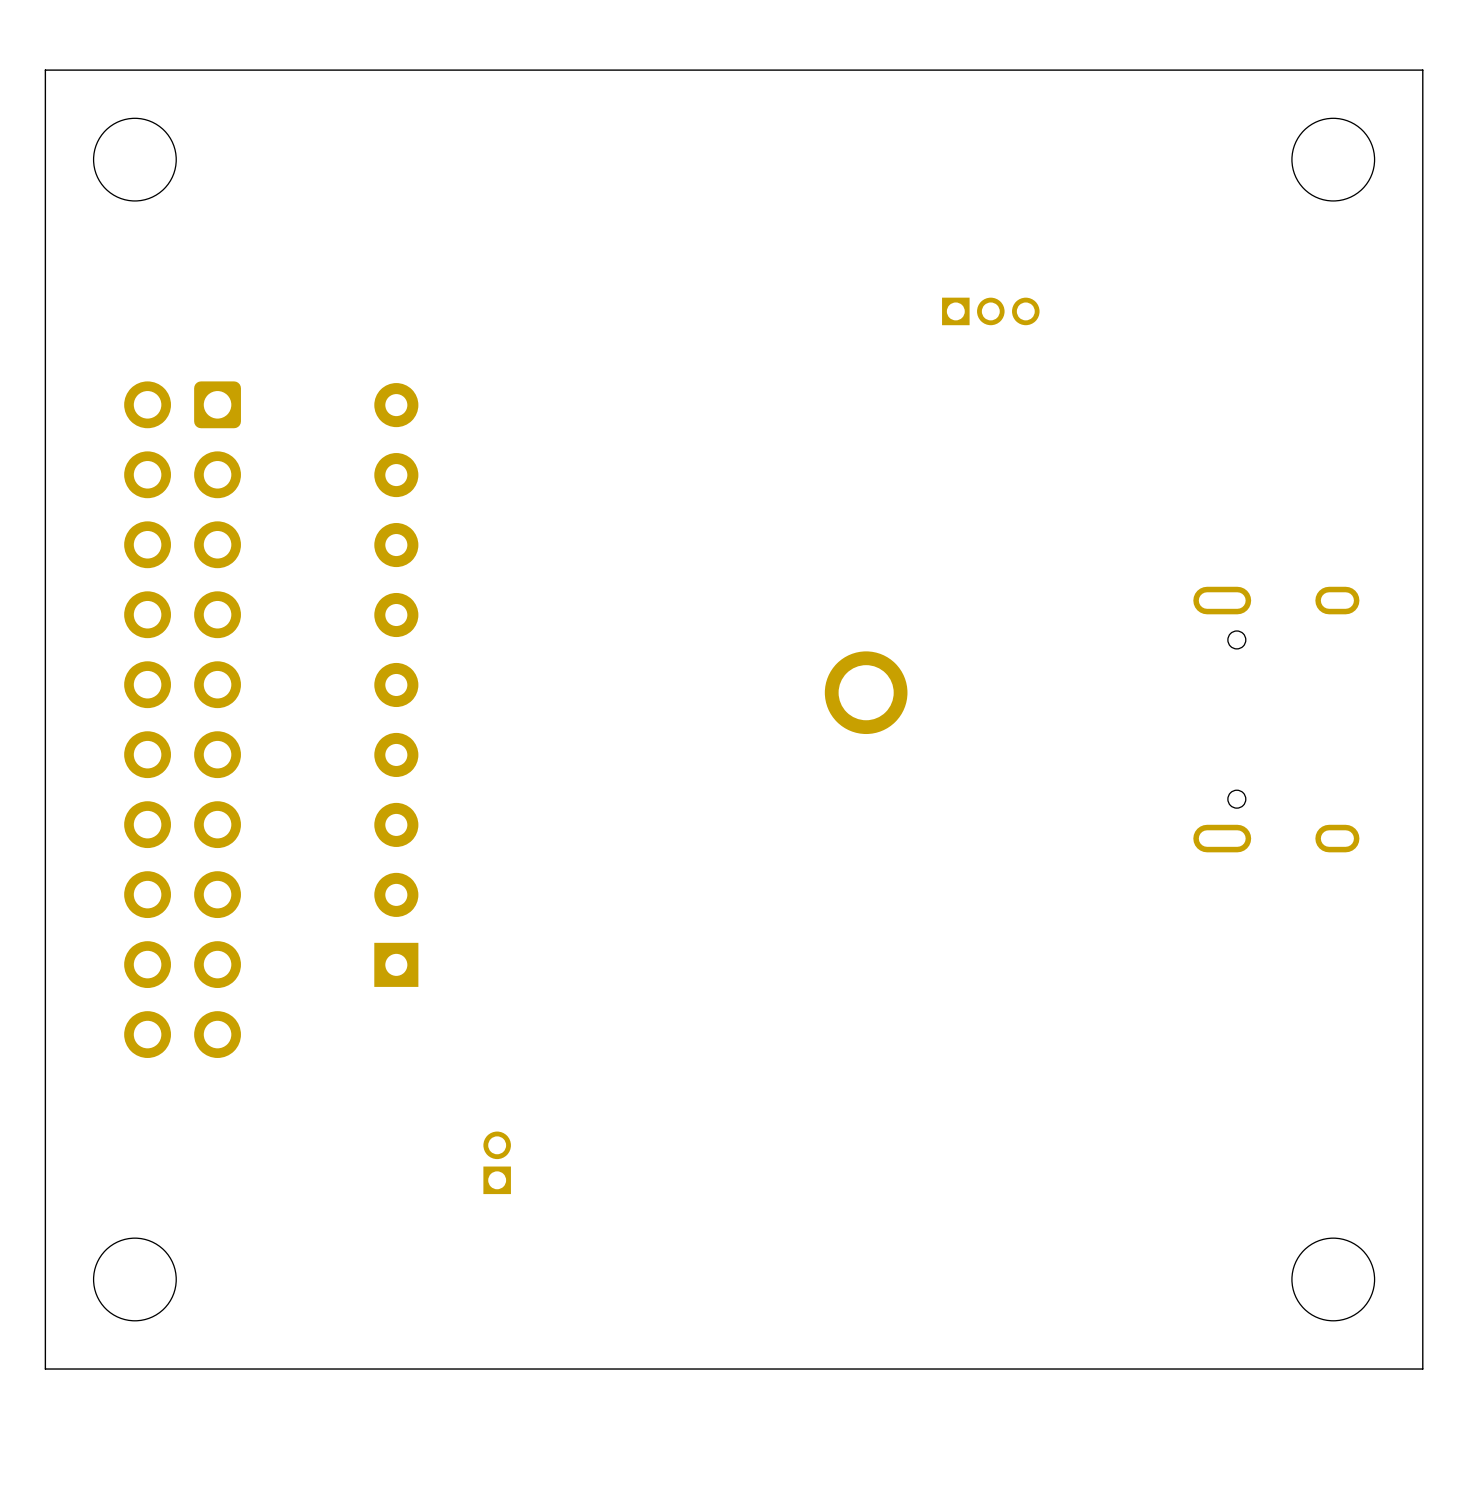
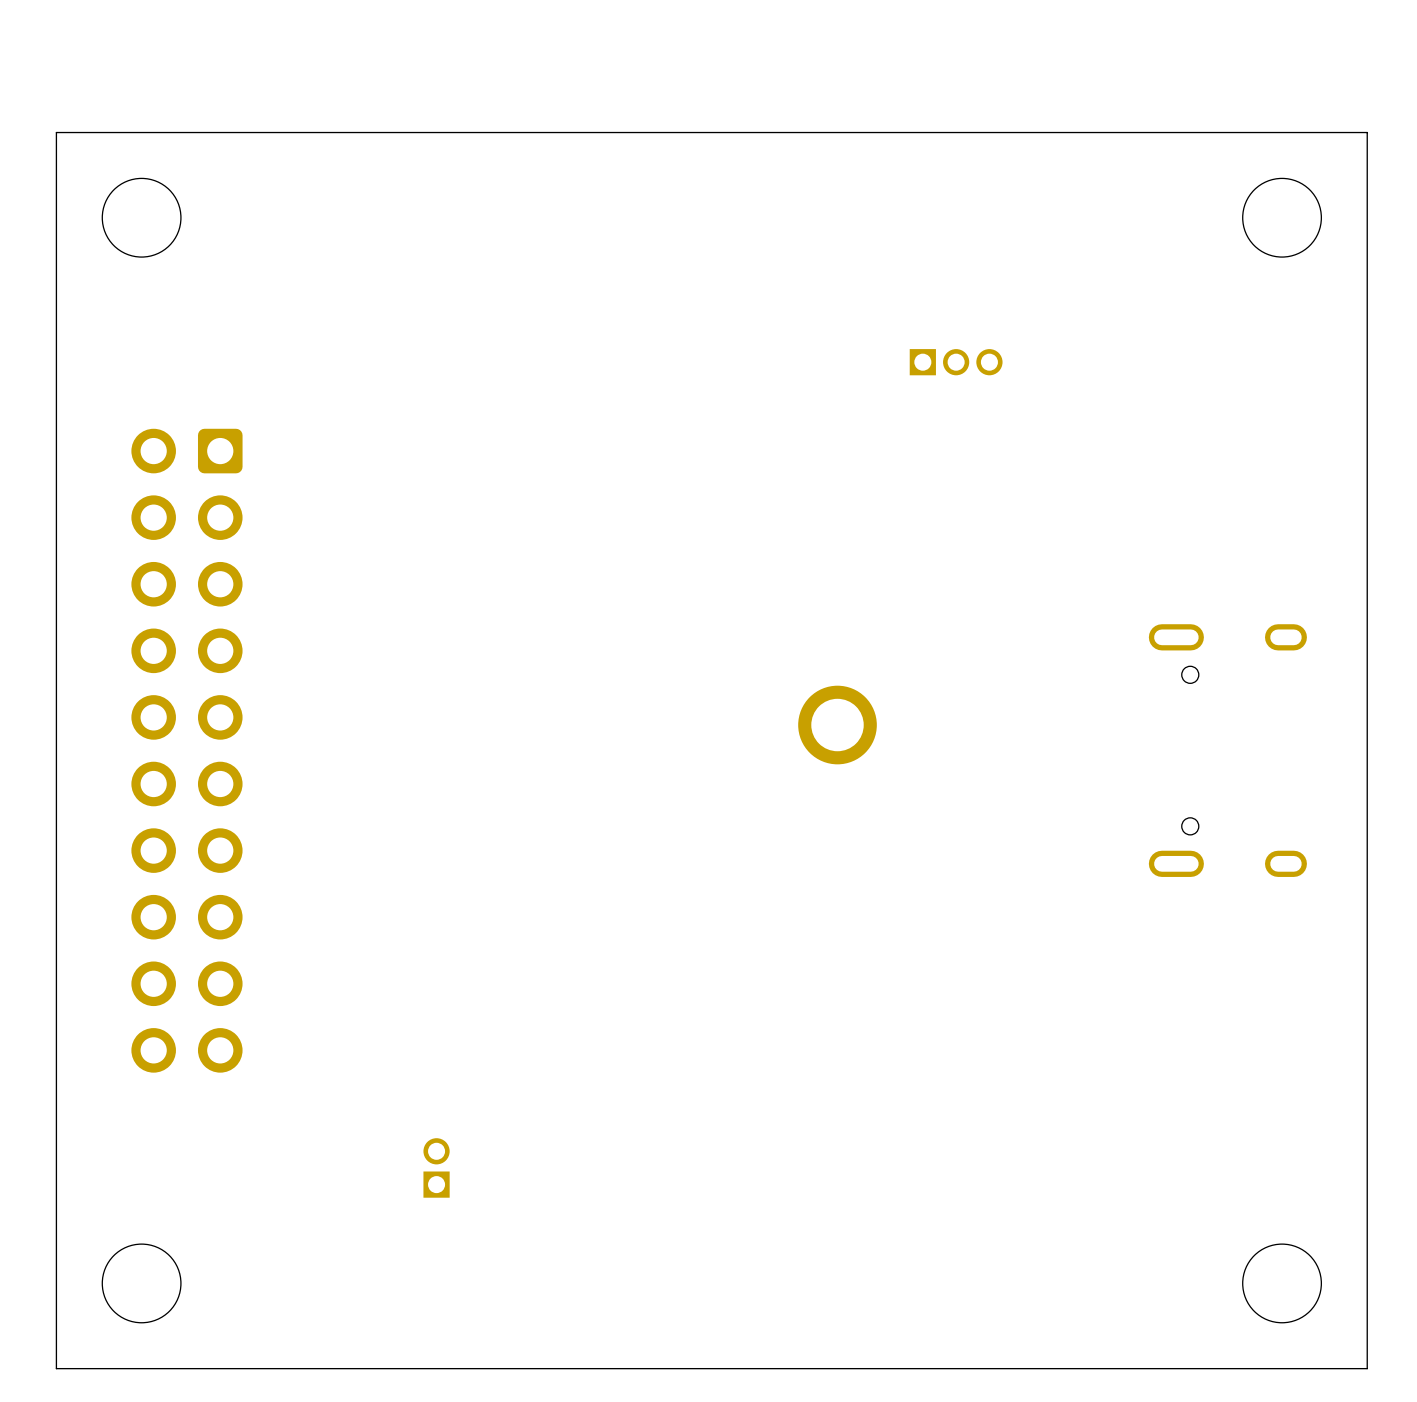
part: (396, 684) -> none
part position: (497, 1162) -> (436, 1167)

